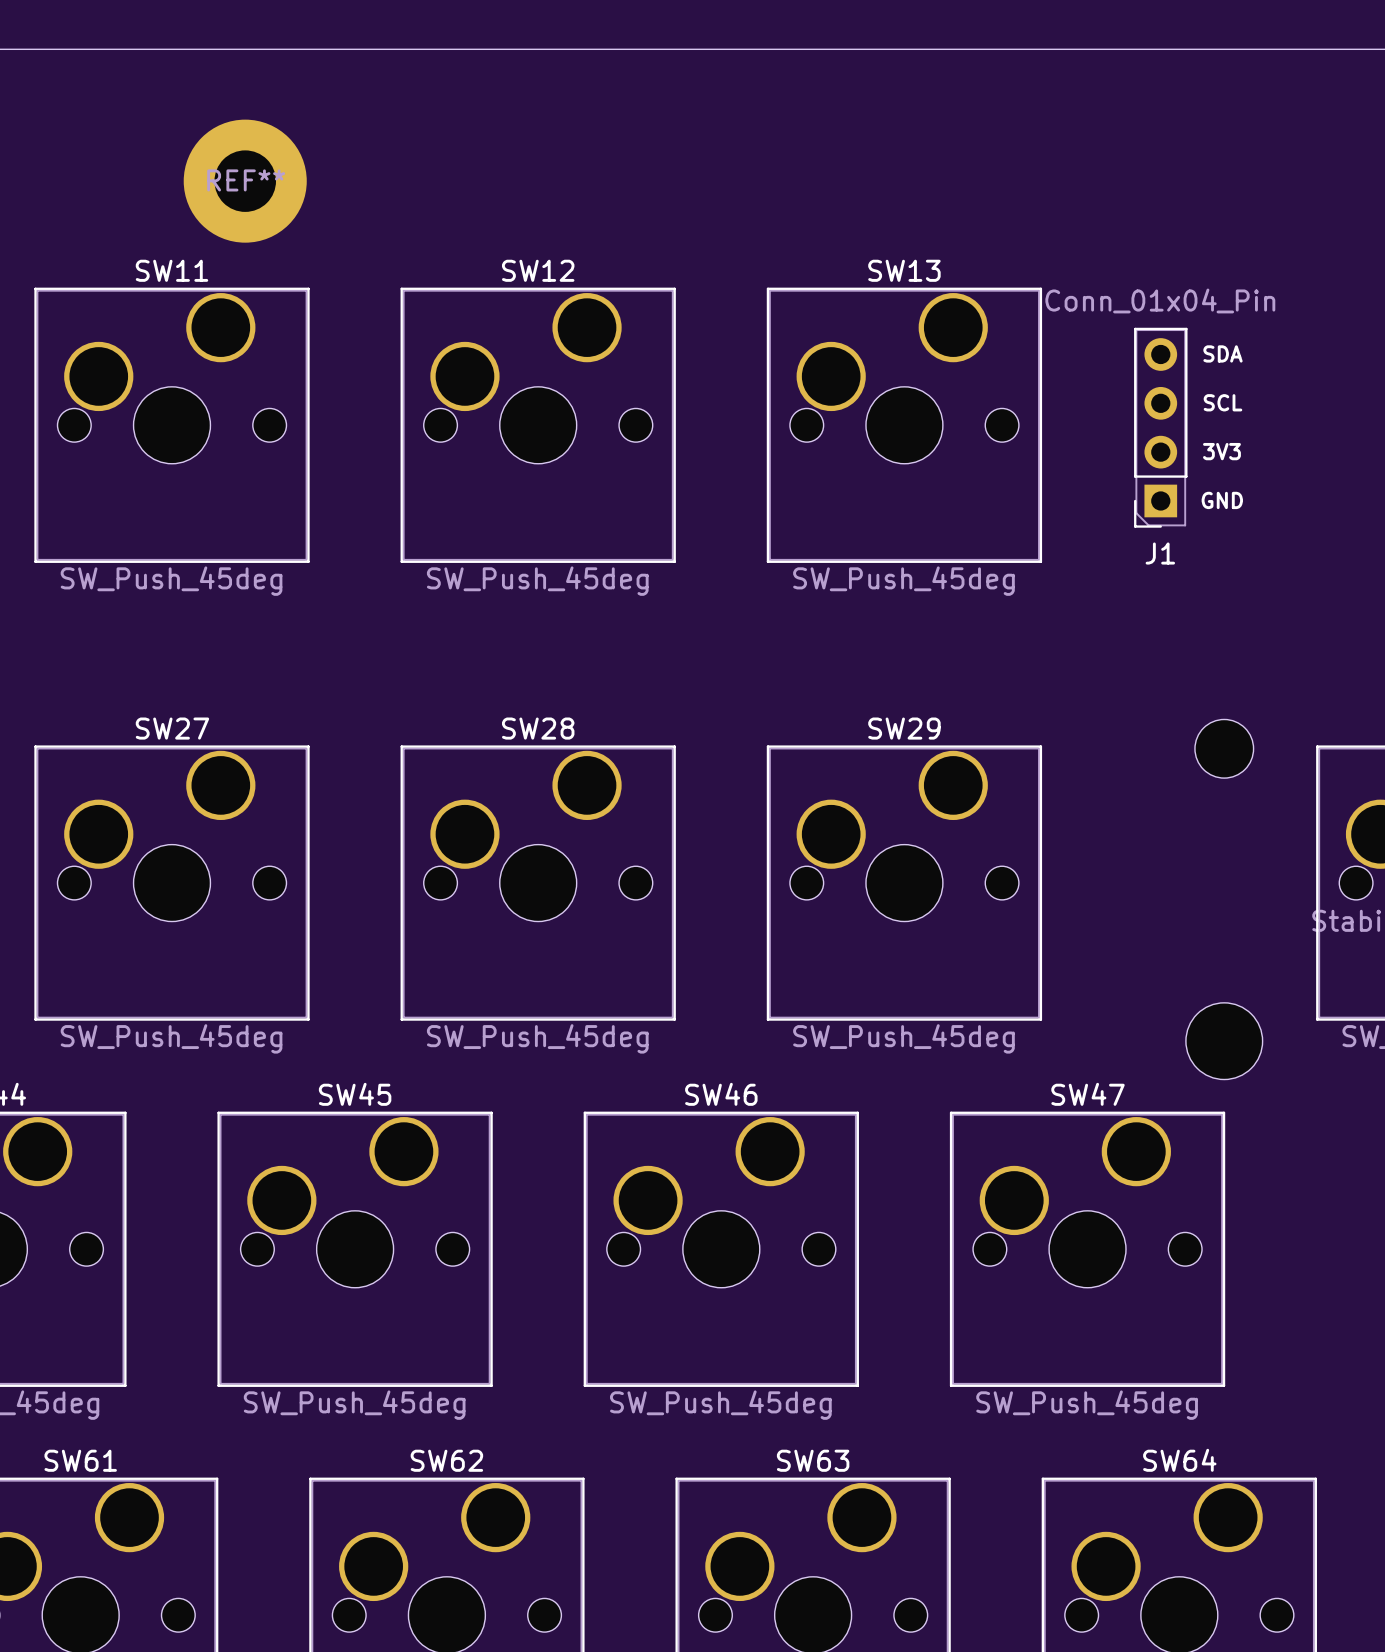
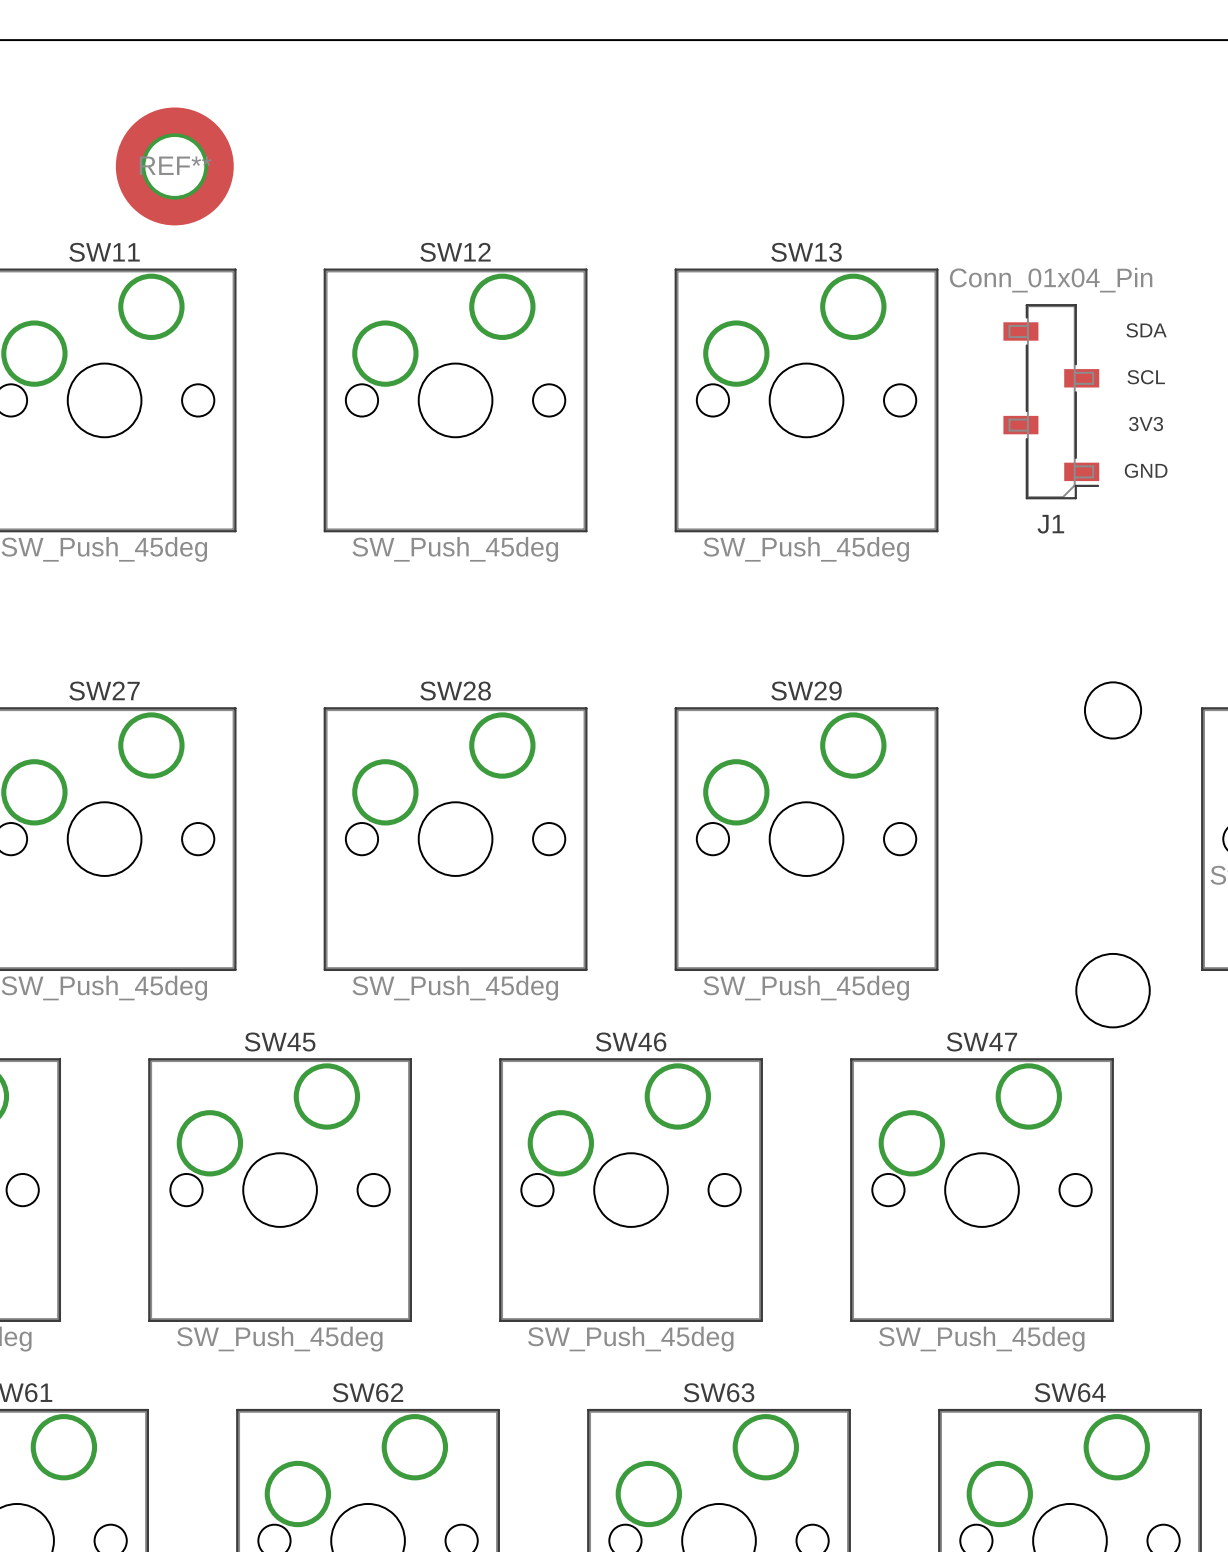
J1 footprint: [1134, 327, 1188, 528] -> [1003, 304, 1100, 500]
text position: SDA (1222, 353) -> SDA (1146, 330)
text position: SCL (1222, 402) -> SCL (1146, 377)
text position: 3V3 (1221, 451) -> 3V3 (1146, 424)
text position: GND (1222, 500) -> GND (1146, 470)

